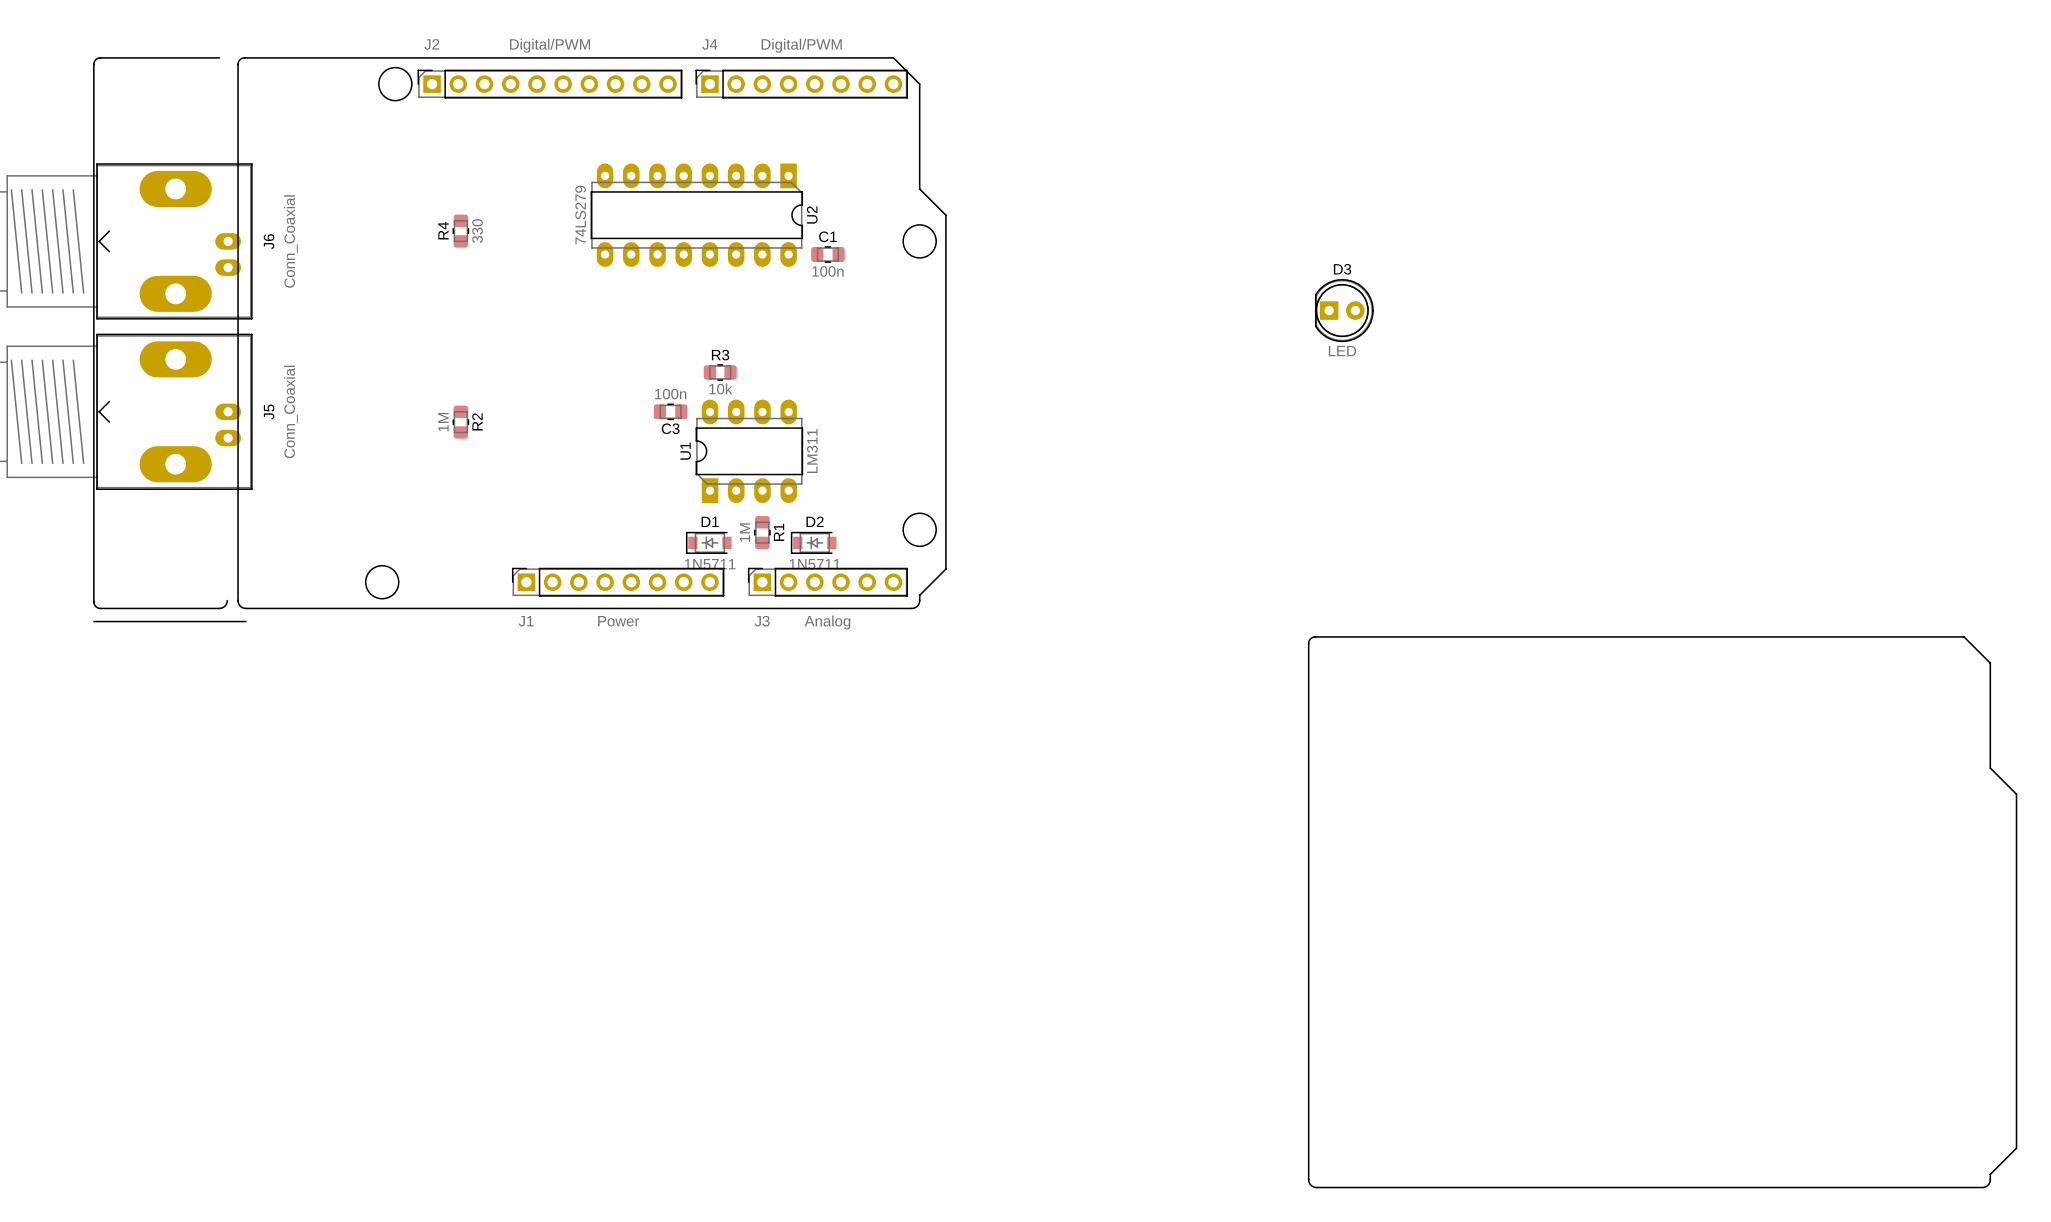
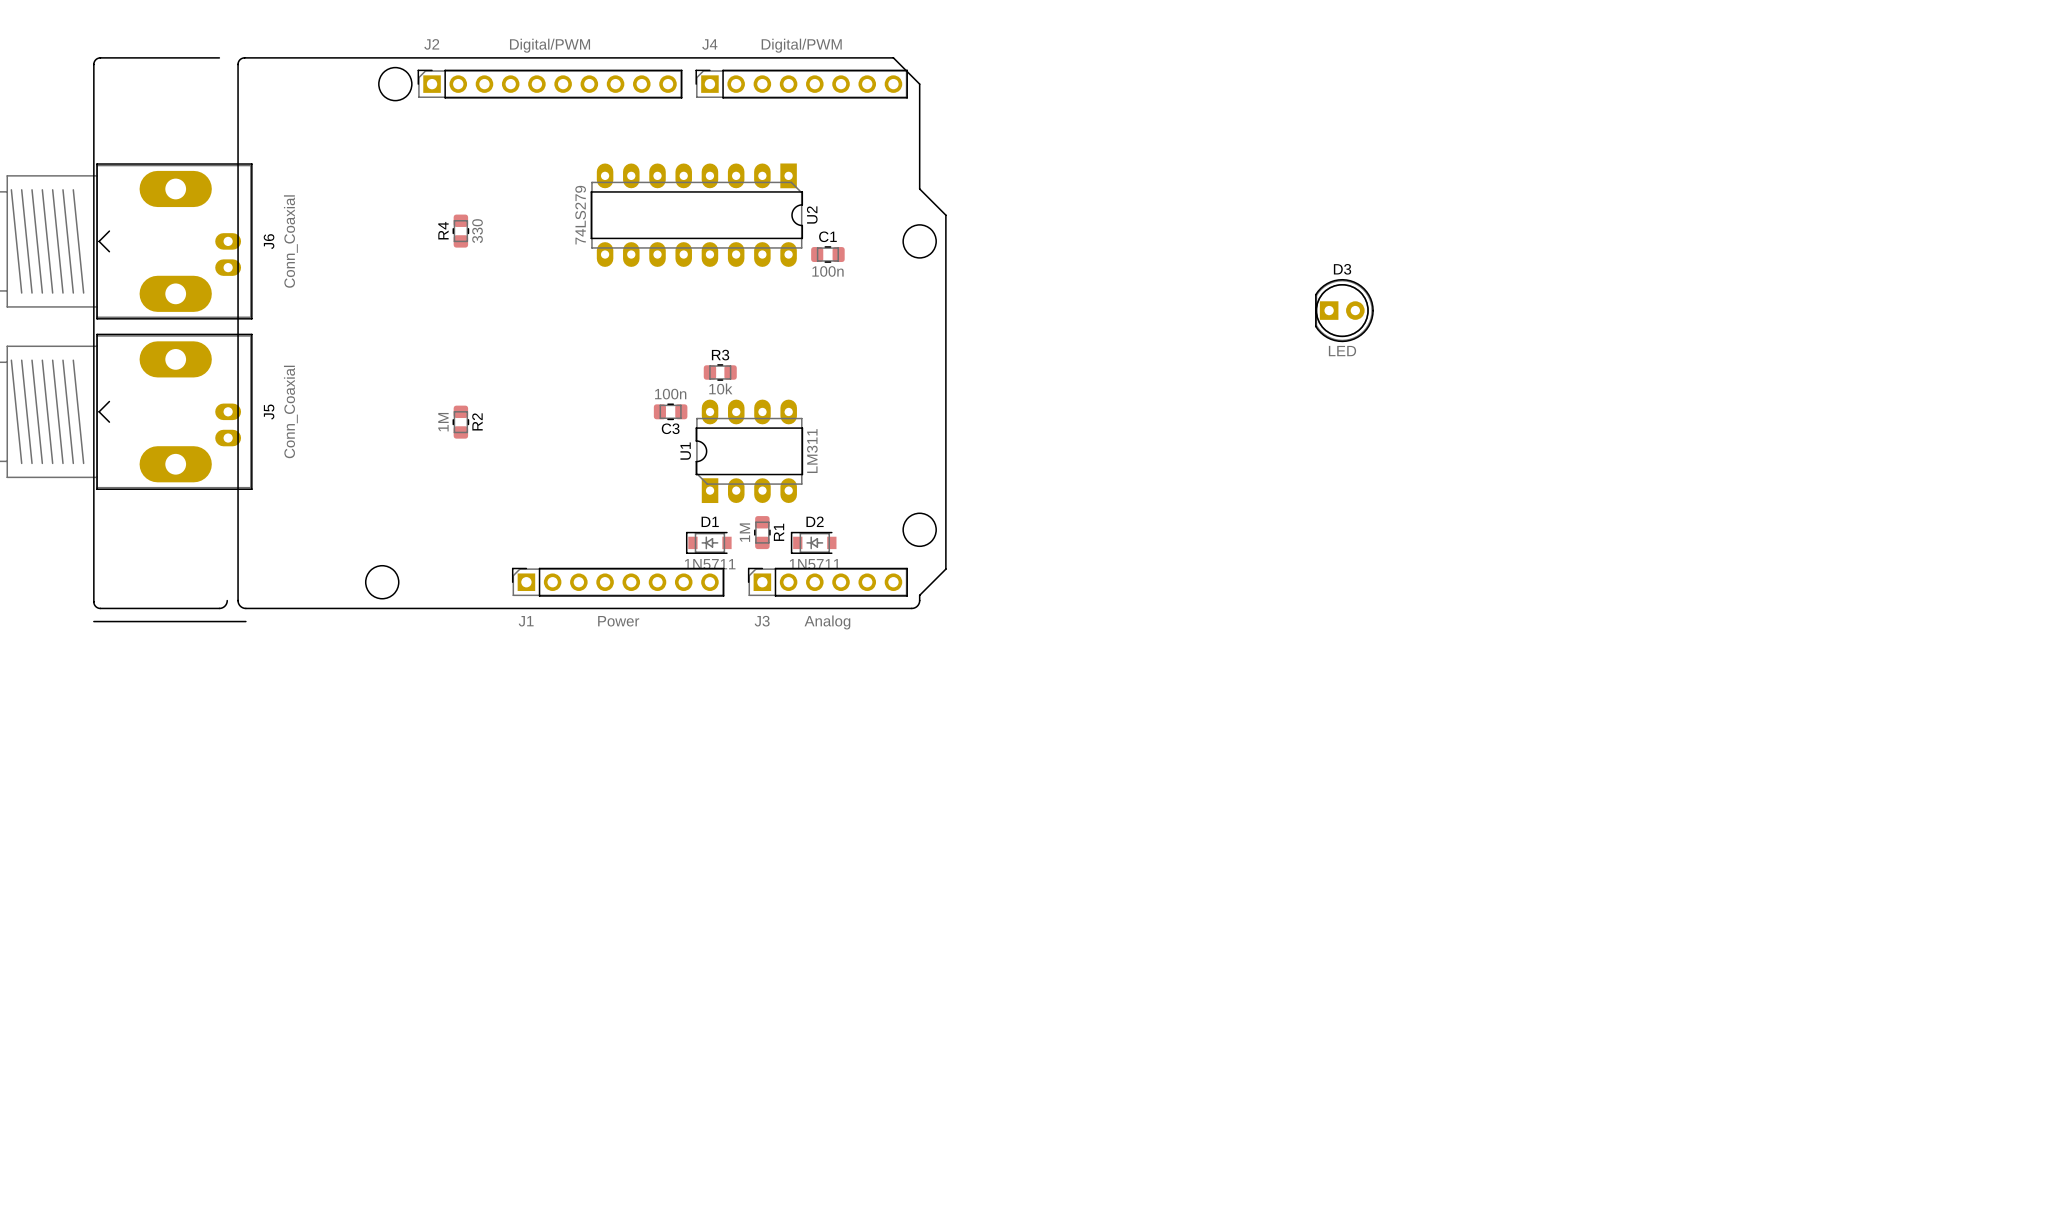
board edge: (1315, 636) (1964, 636) (1990, 663) (1990, 768) (2016, 794) (2016, 1148) (1990, 1174) (1988, 1184) (1982, 1187) (1316, 1187) (1311, 1185) (1308, 1179) (1308, 643) (1310, 638) (1315, 636) -> none

